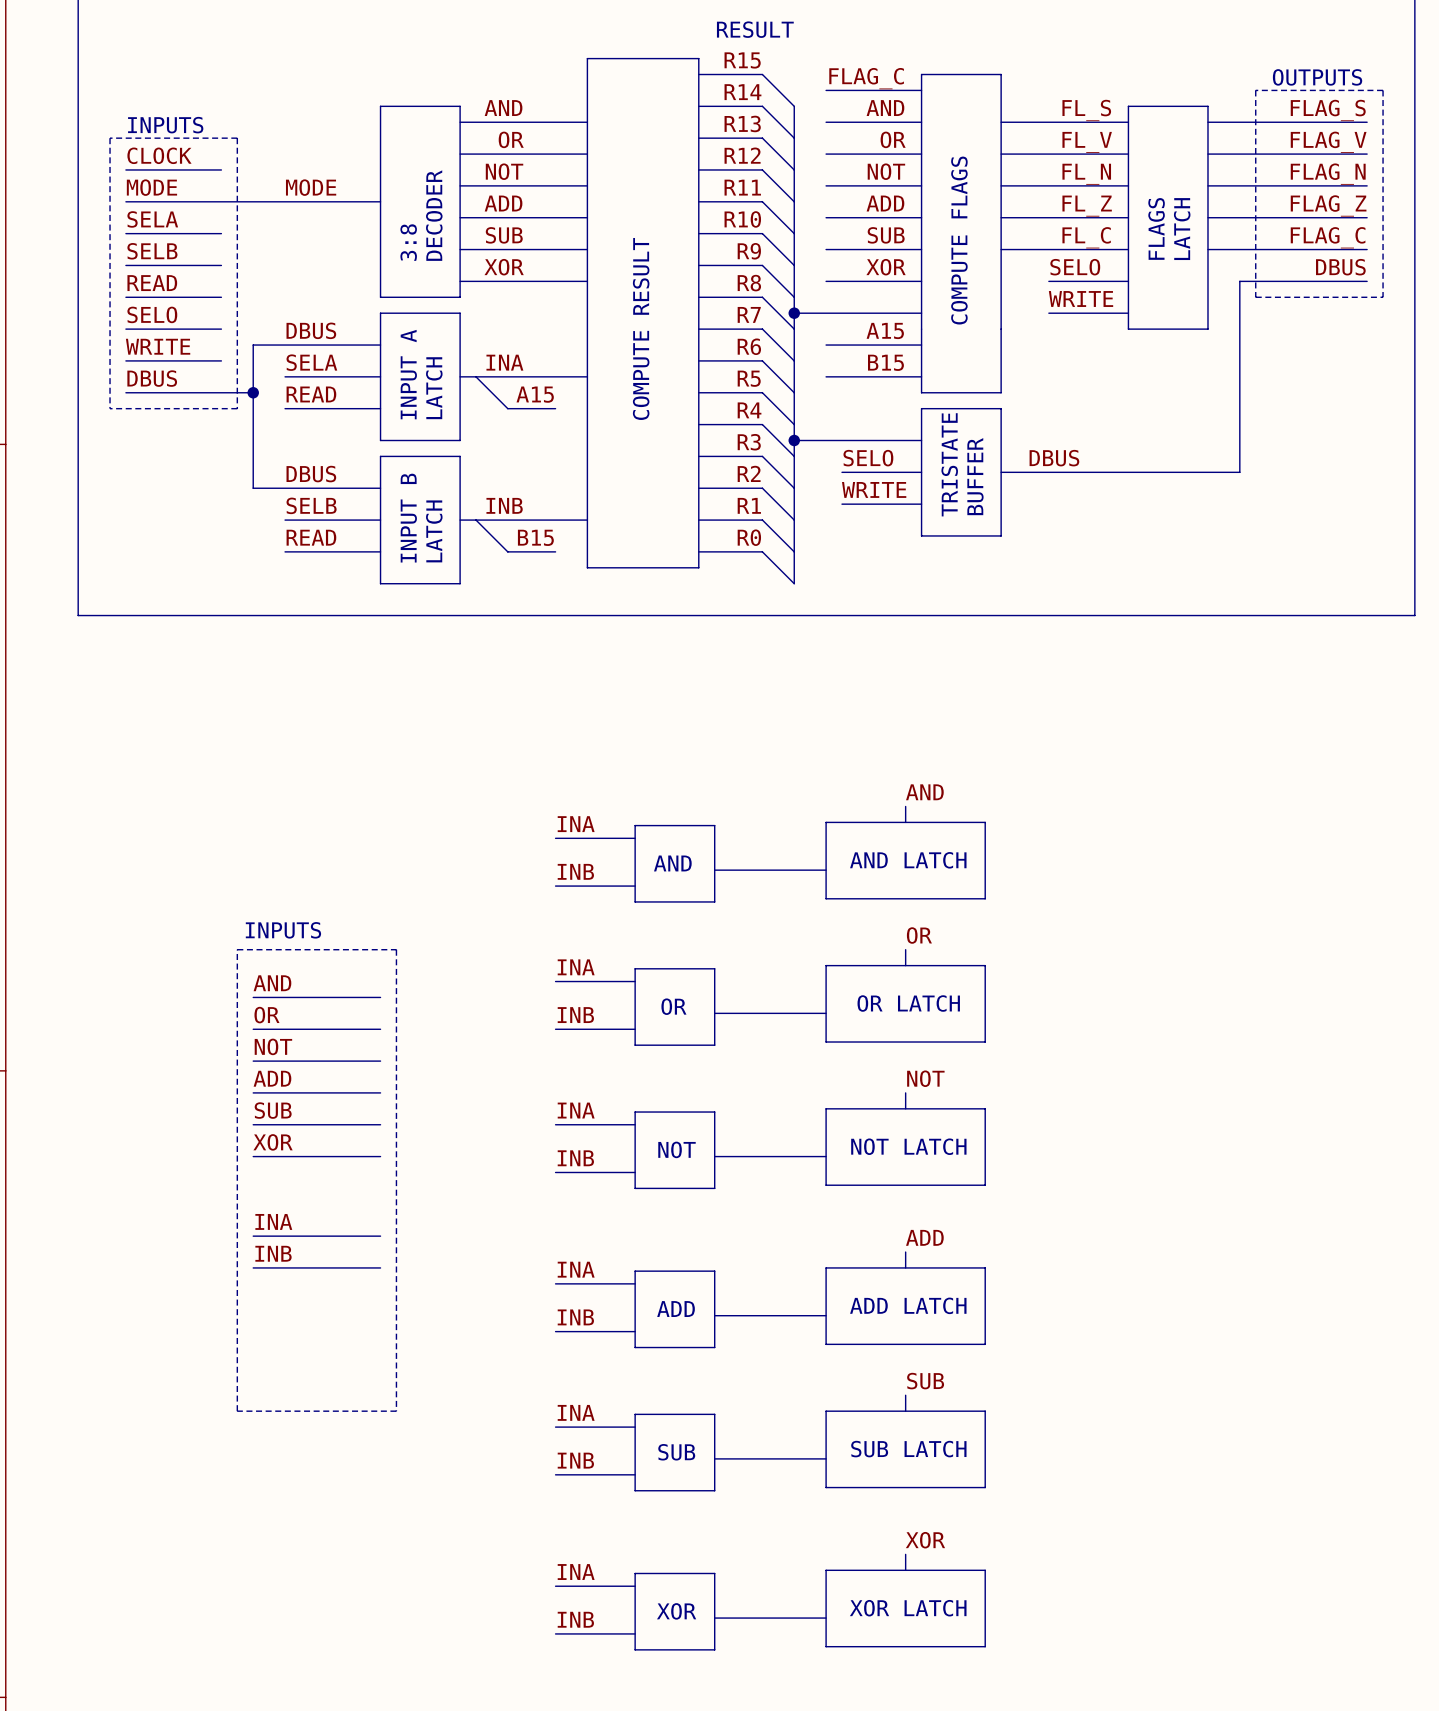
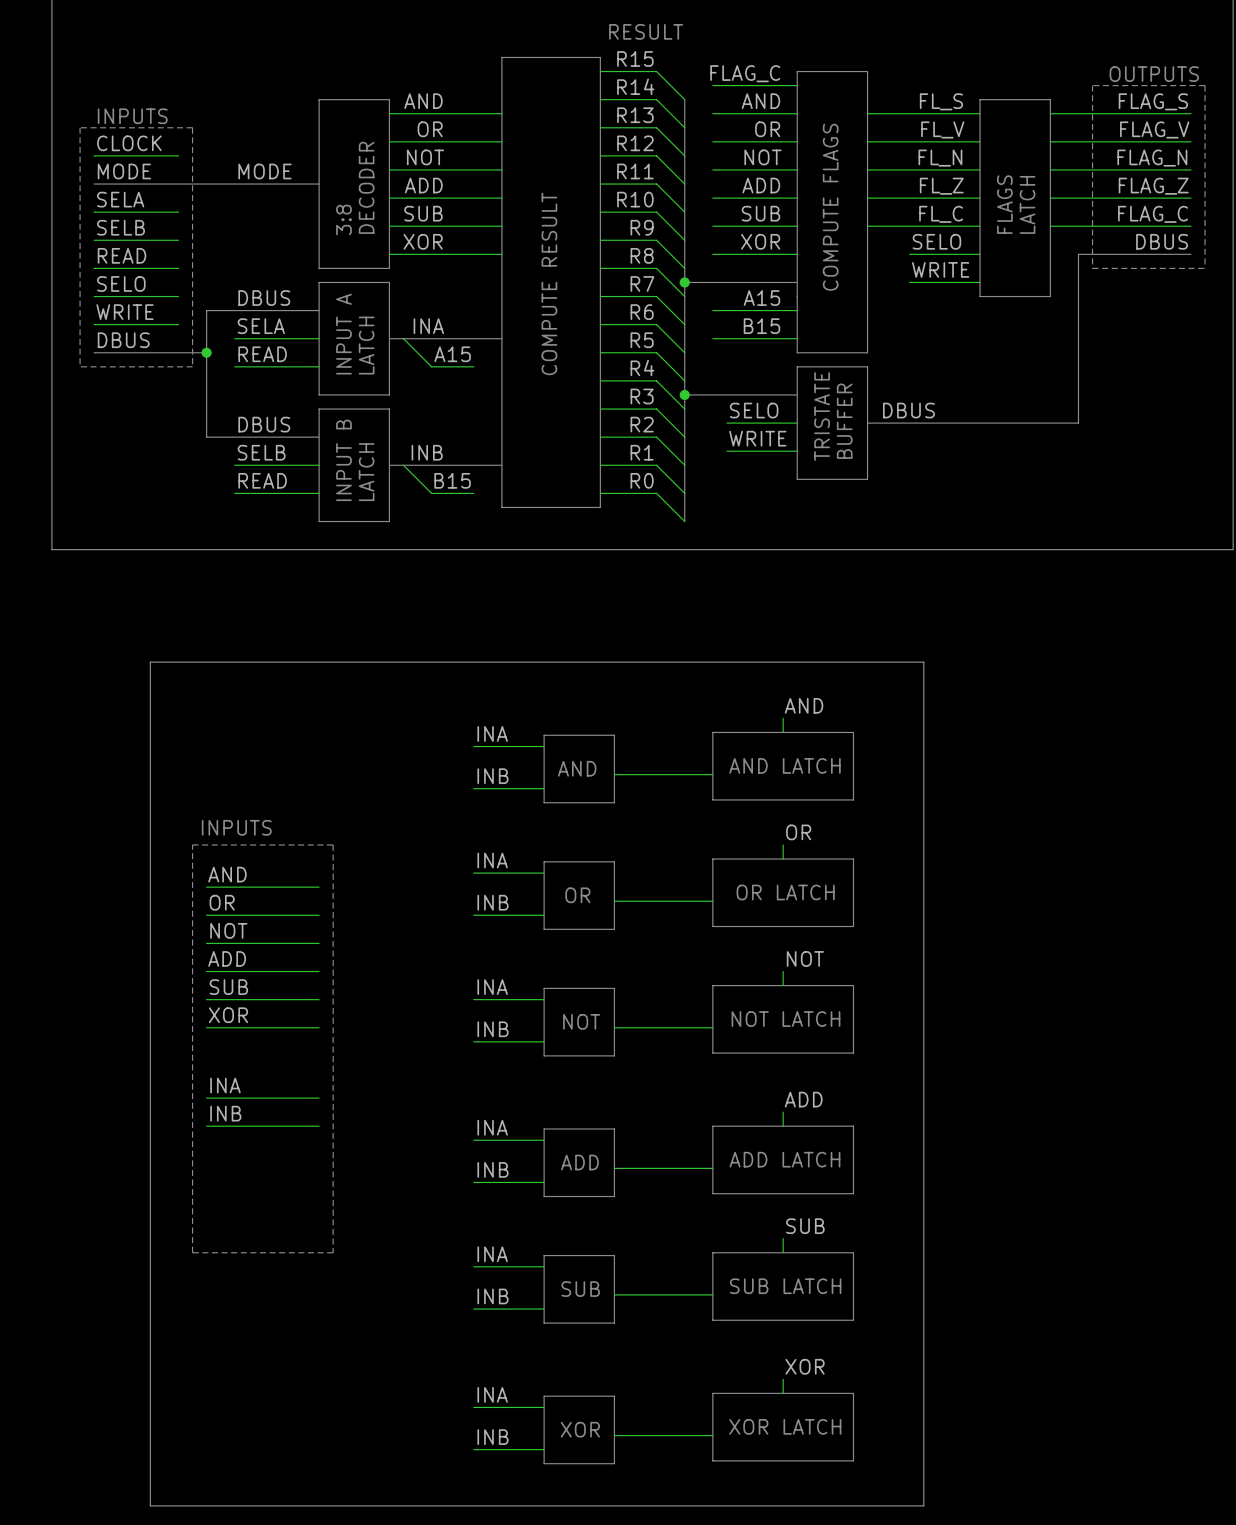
line: none -> (150, 662) (923, 662) (923, 1505) (150, 1505) (150, 662)

